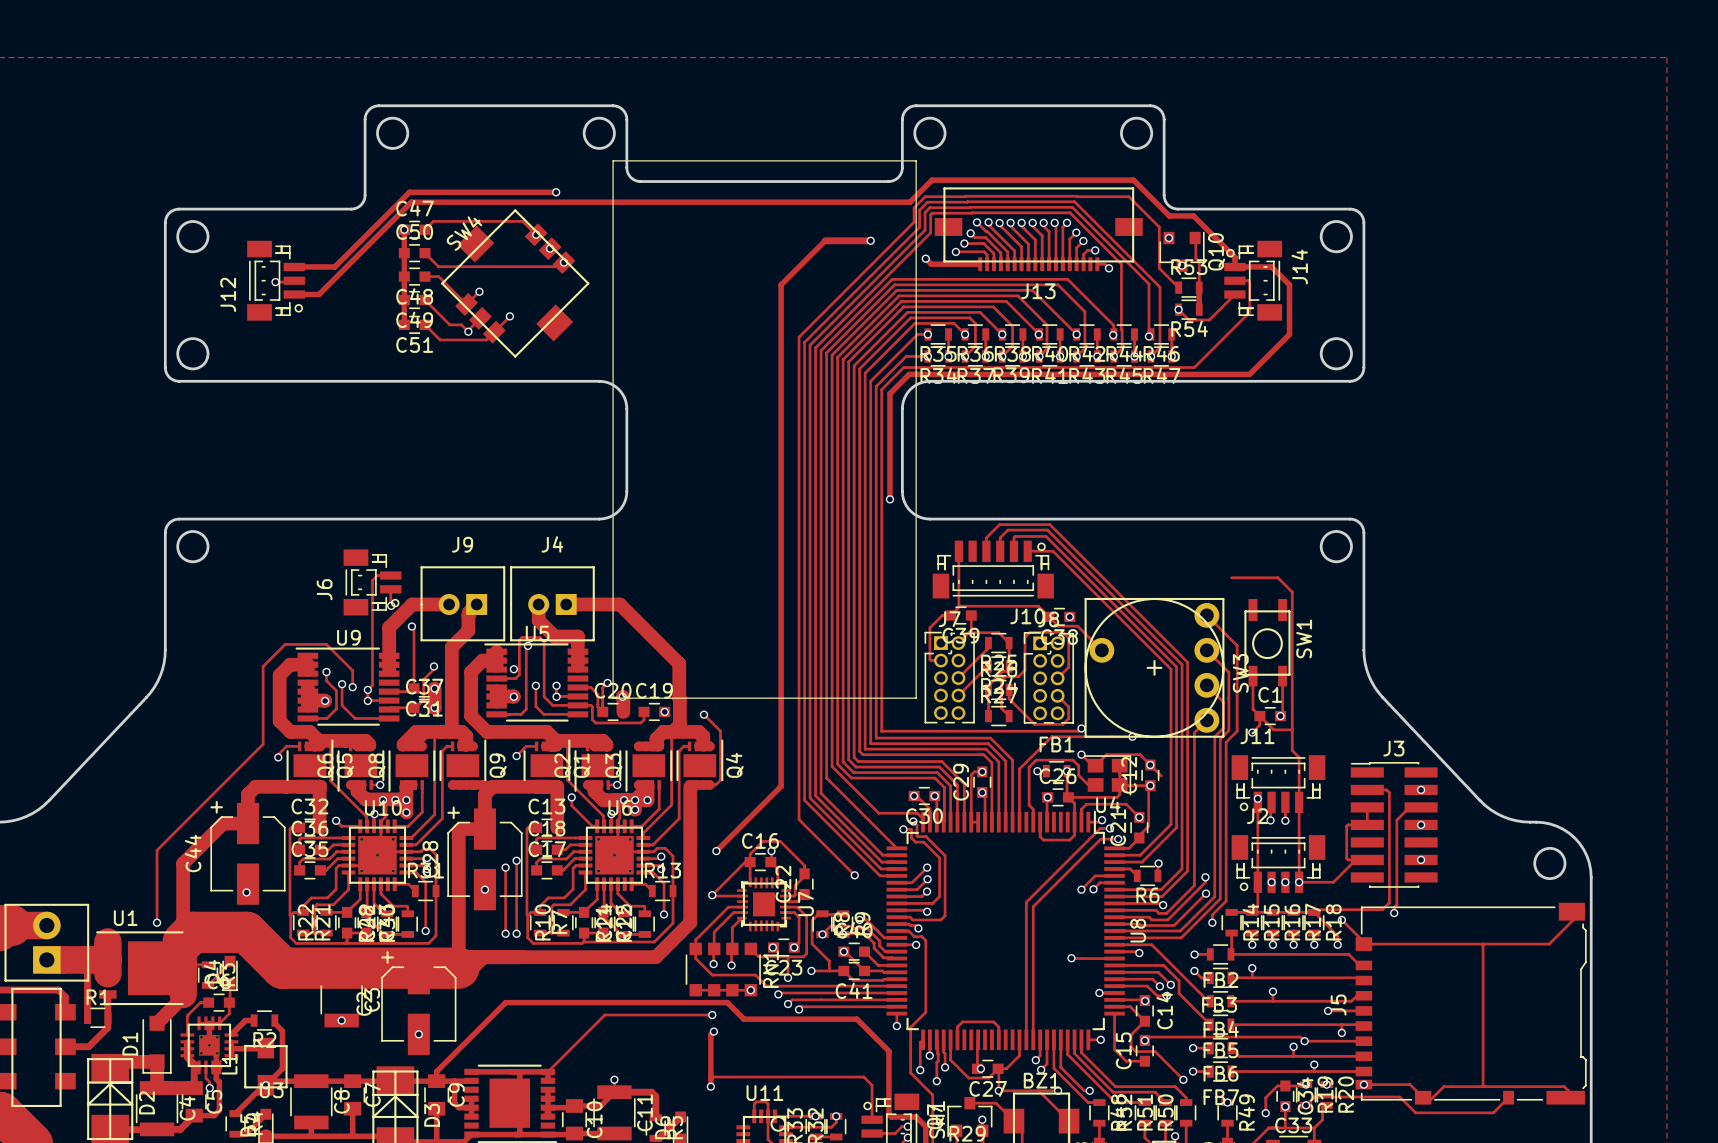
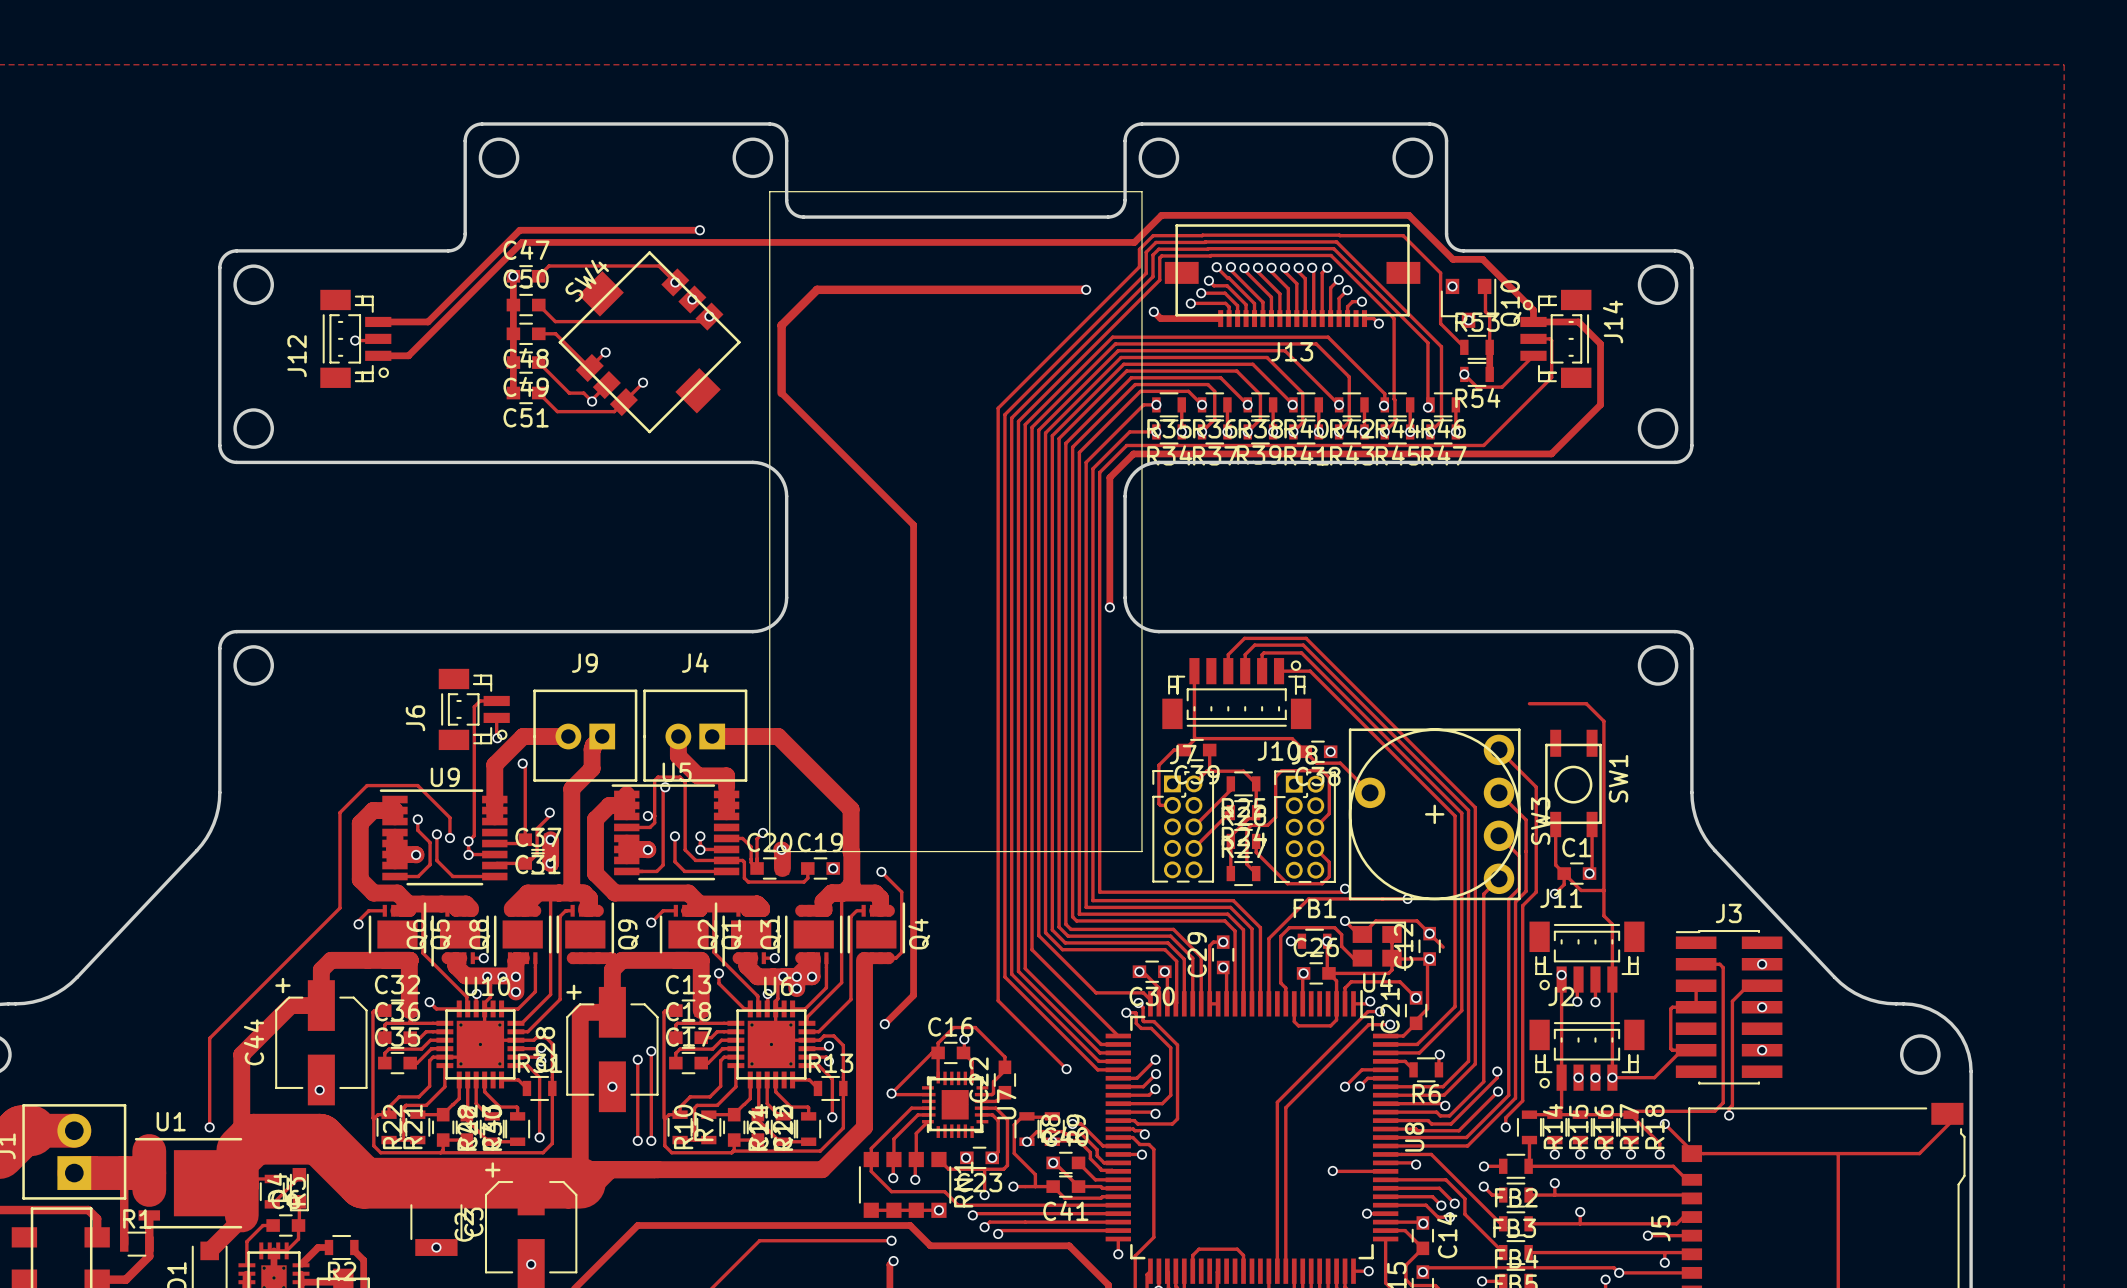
track: (825, 240) (781, 284) (781, 786) (716, 851) -> (1030, 289) (817, 289) (781, 325) (781, 393) (913, 525) (913, 995) (884, 1024)
via position: (716, 851) -> (884, 1024)

